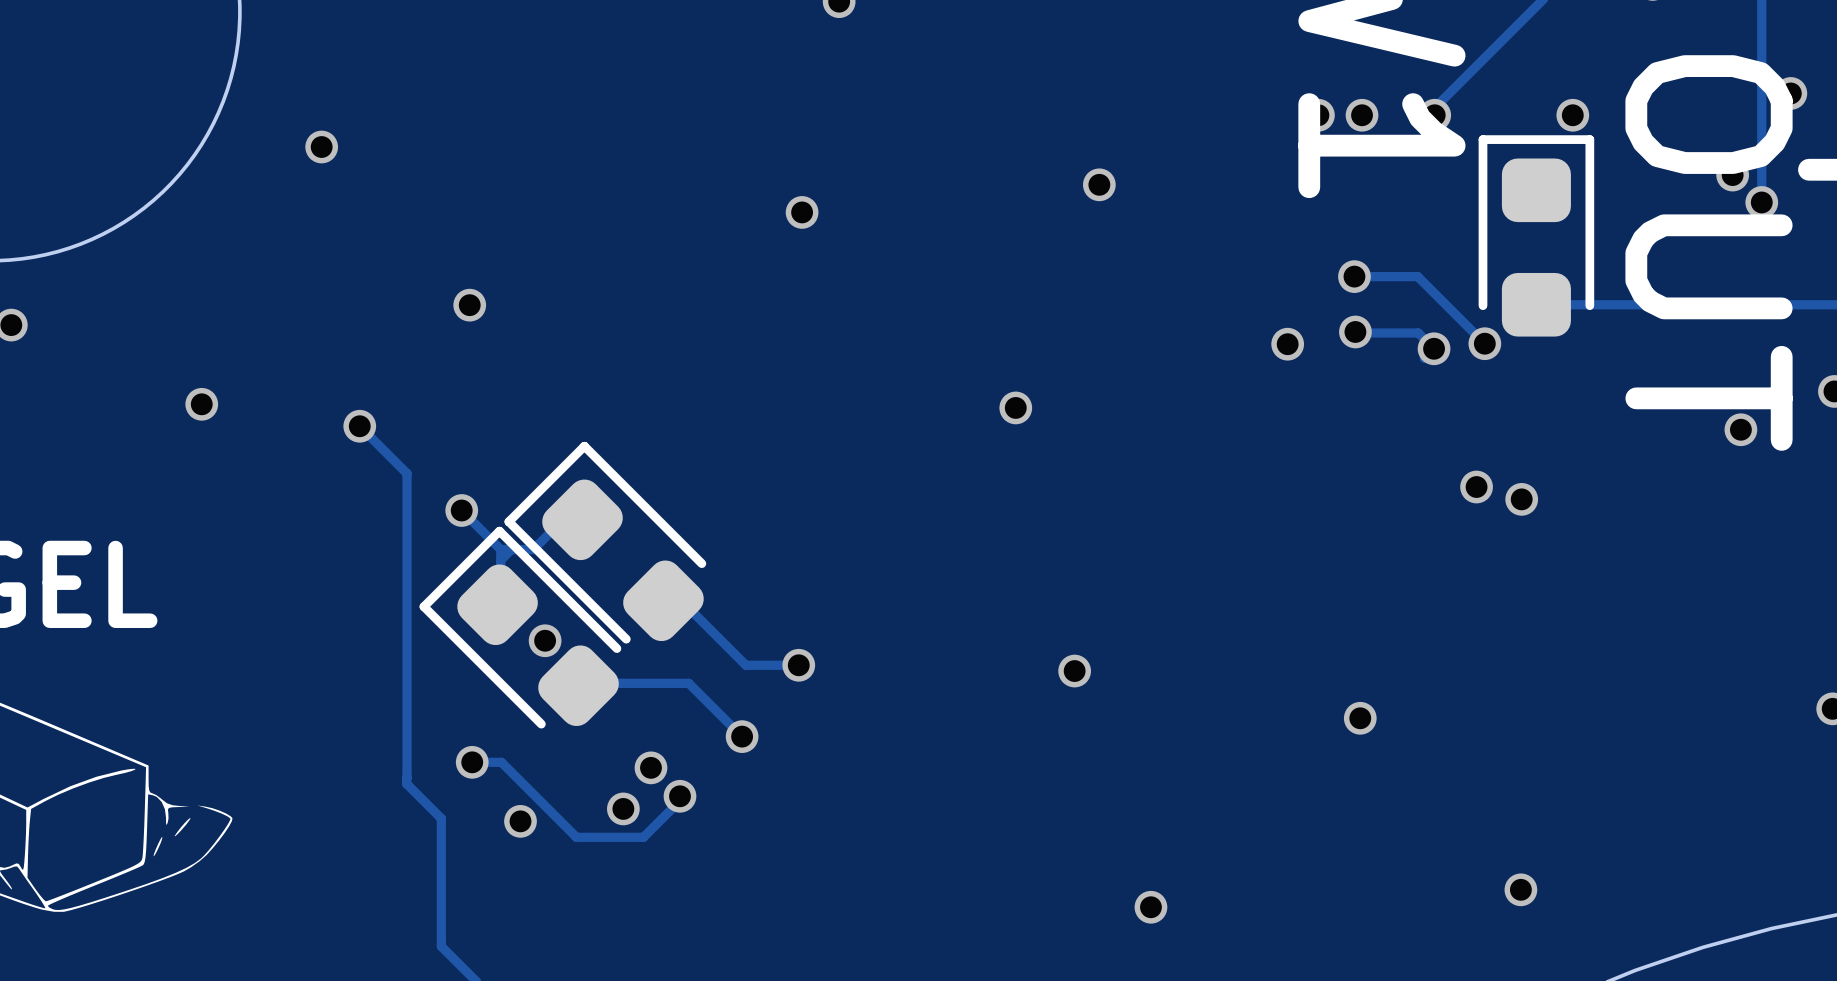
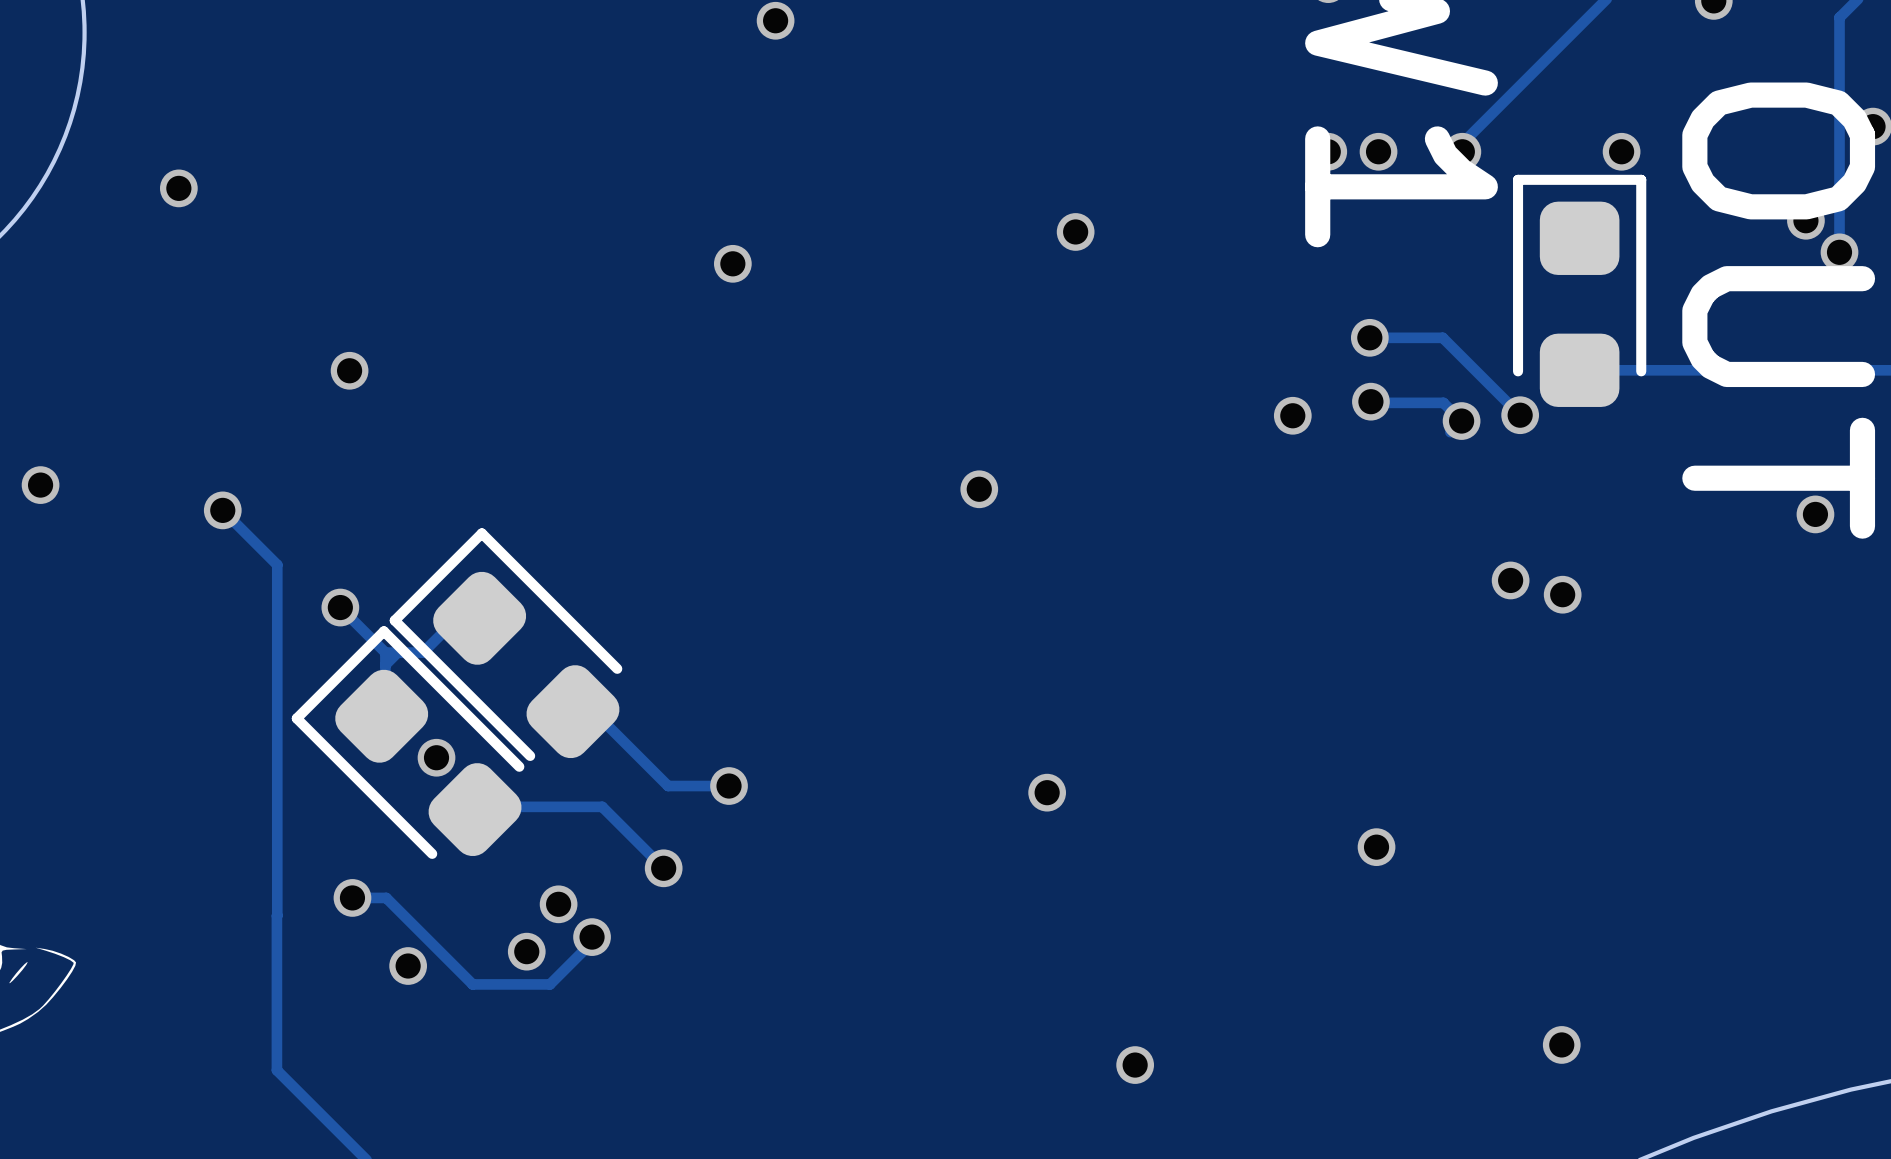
track: (406, 783) (441, 818) (441, 946) -> (276, 922) (276, 1070) (316, 1110)

